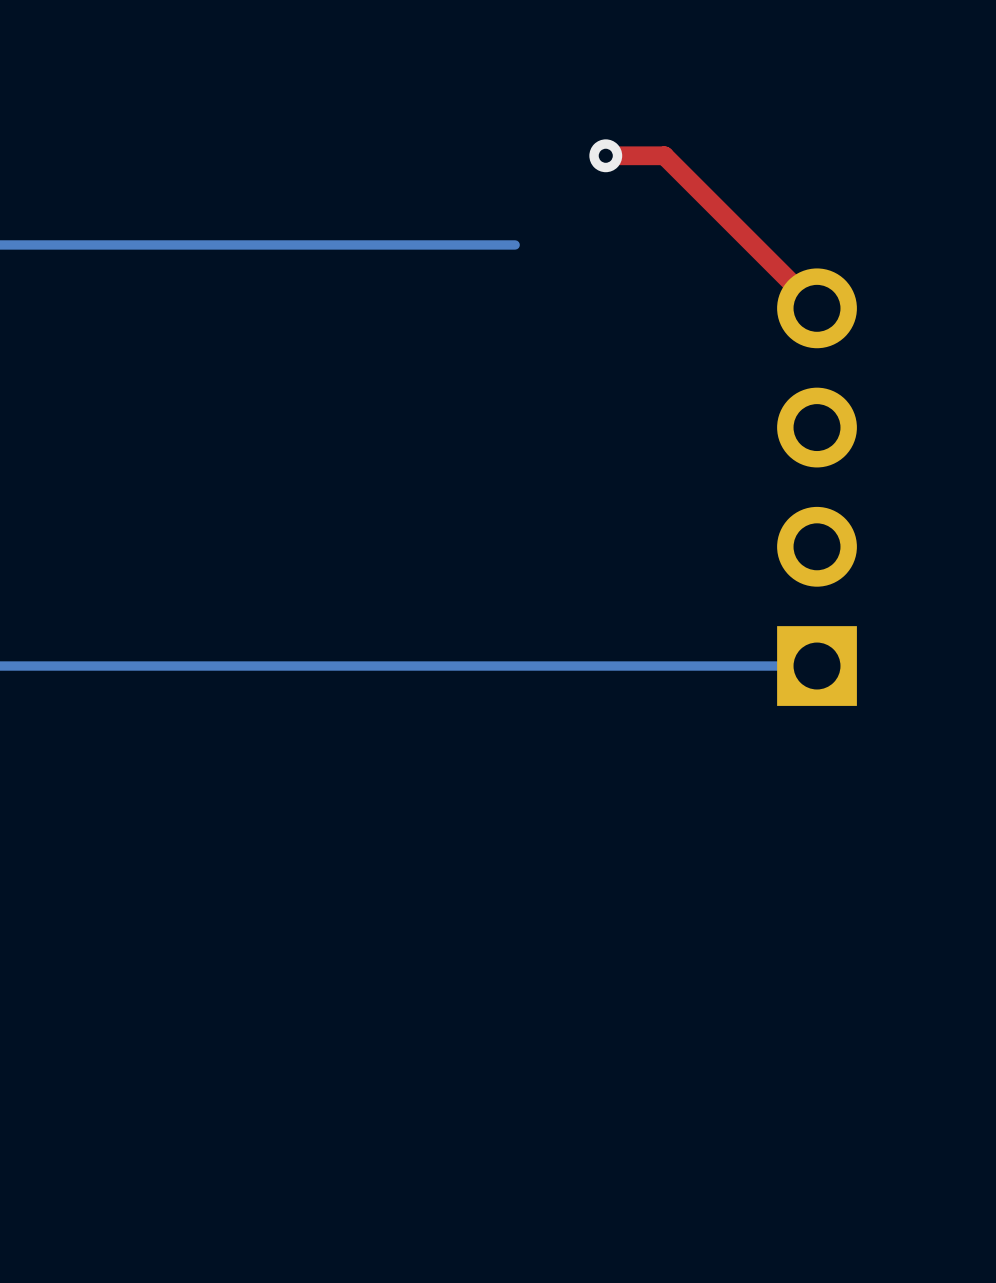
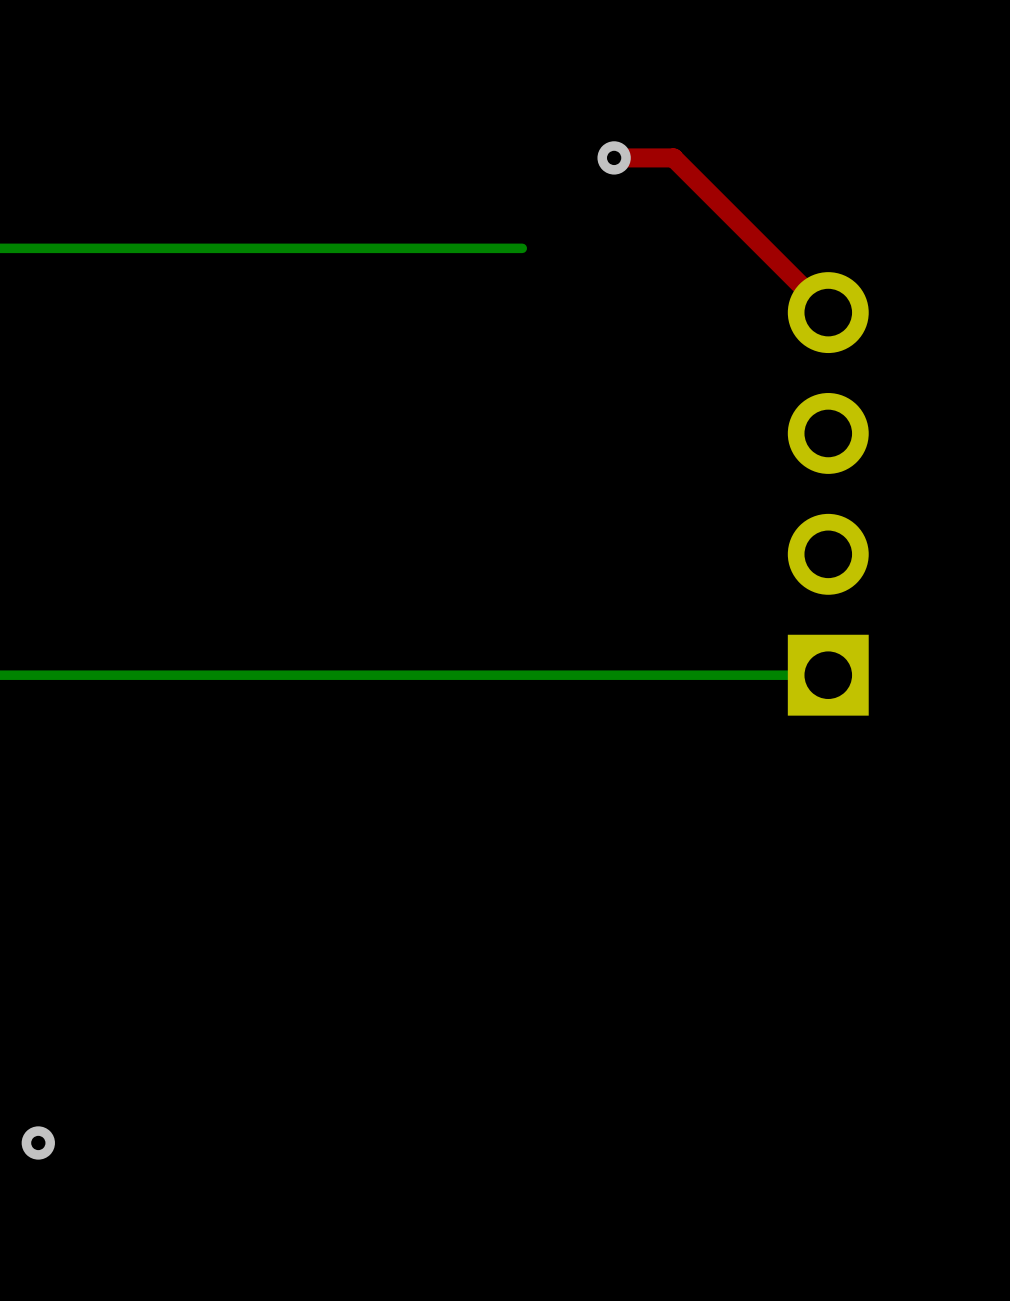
via: none -> (38, 1142)

